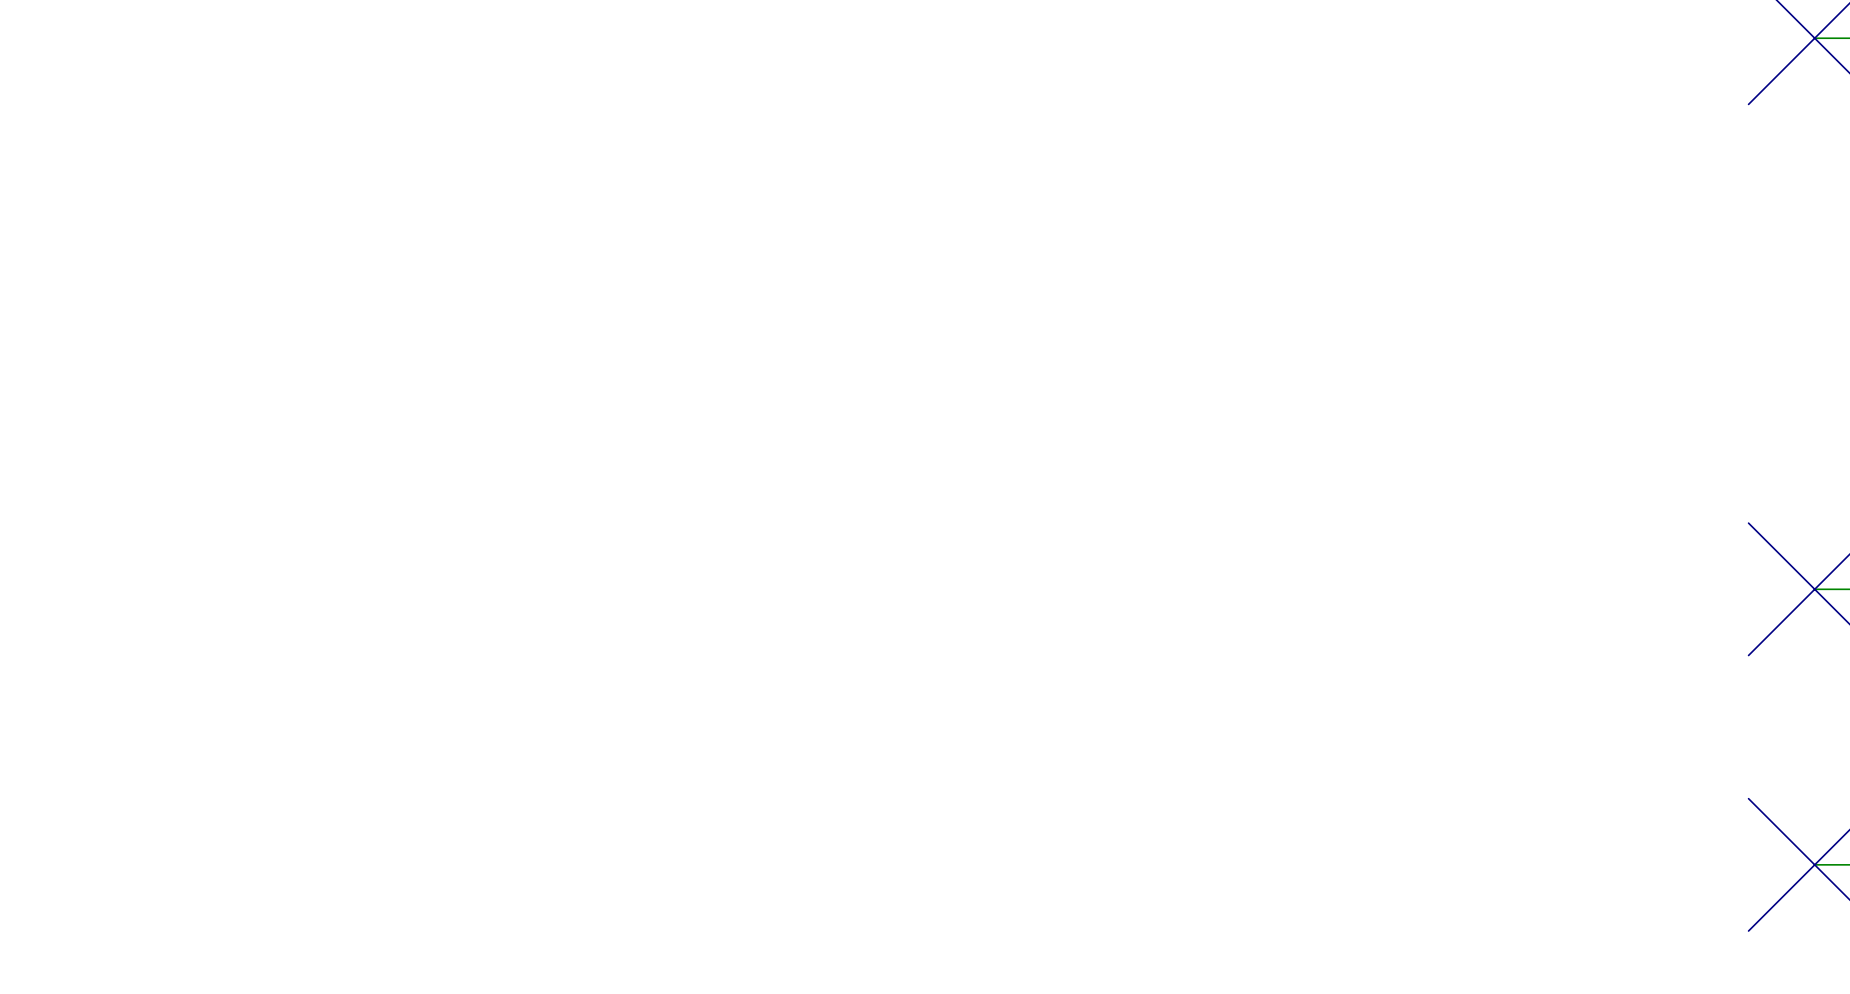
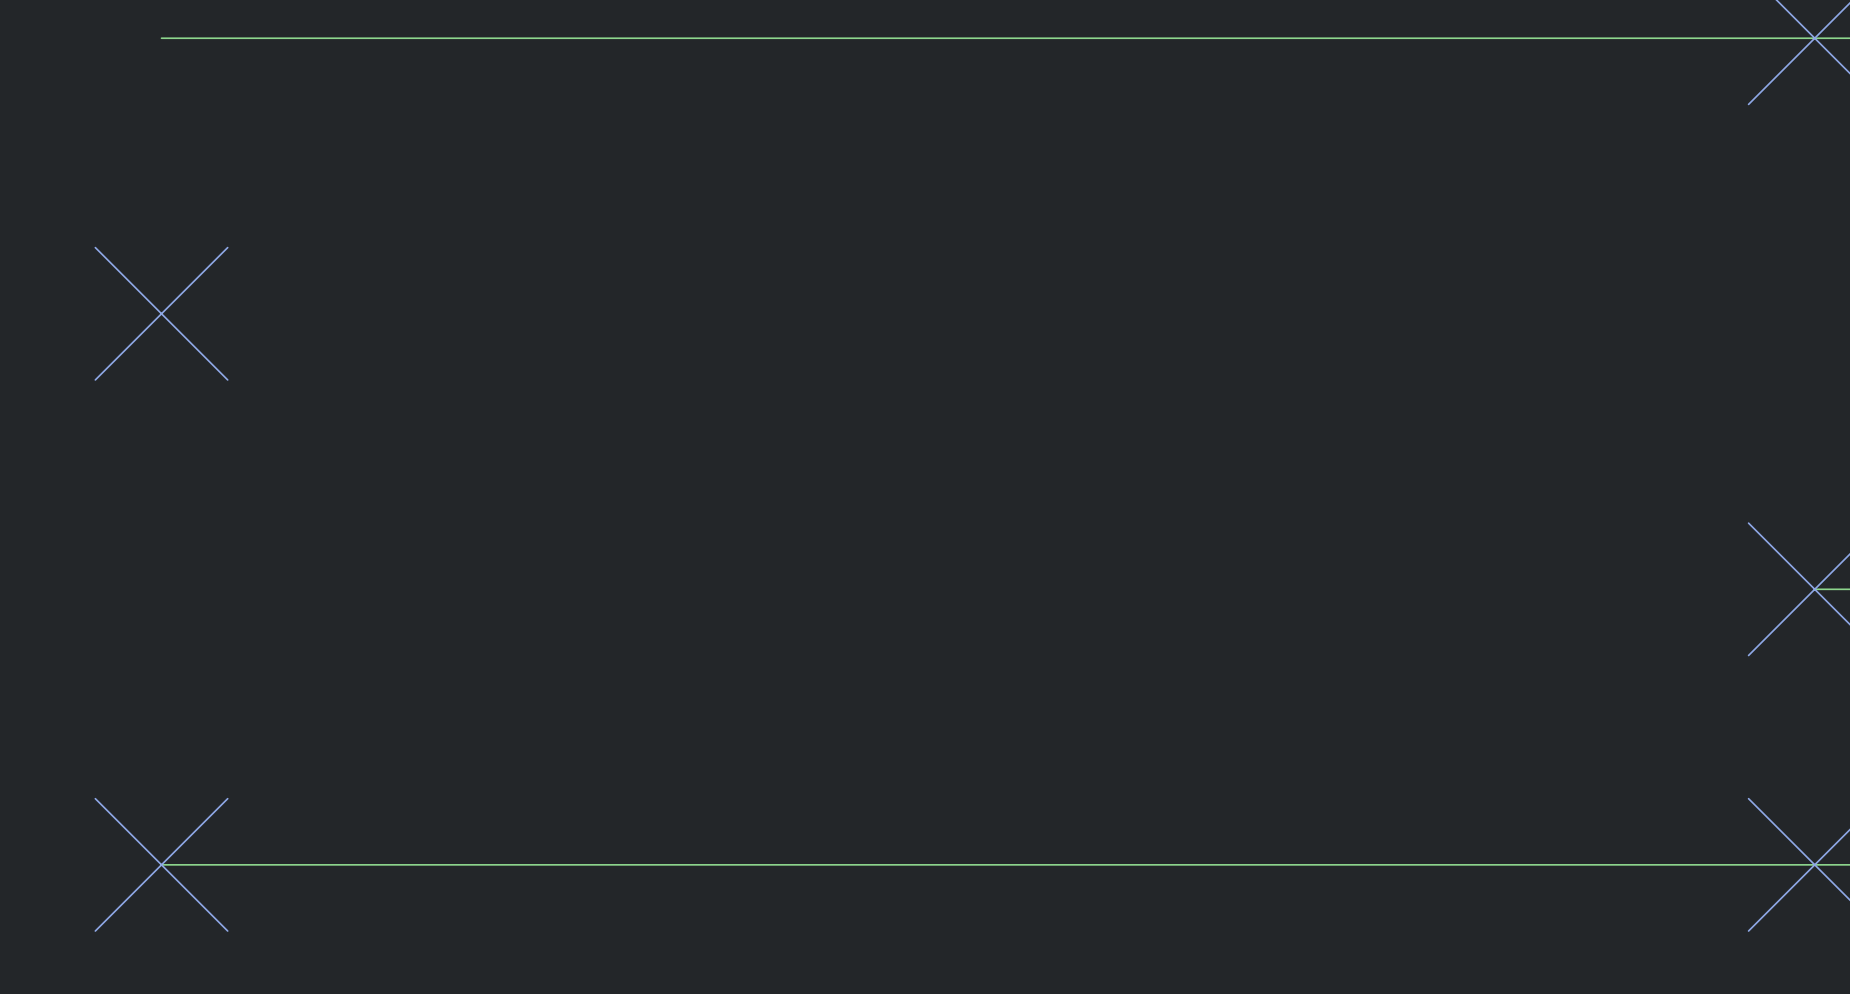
wire: none -> (161, 38) (1814, 38)
no-connect mark: none -> (161, 313)
wire: none -> (161, 864) (1814, 864)
no-connect mark: none -> (161, 864)

